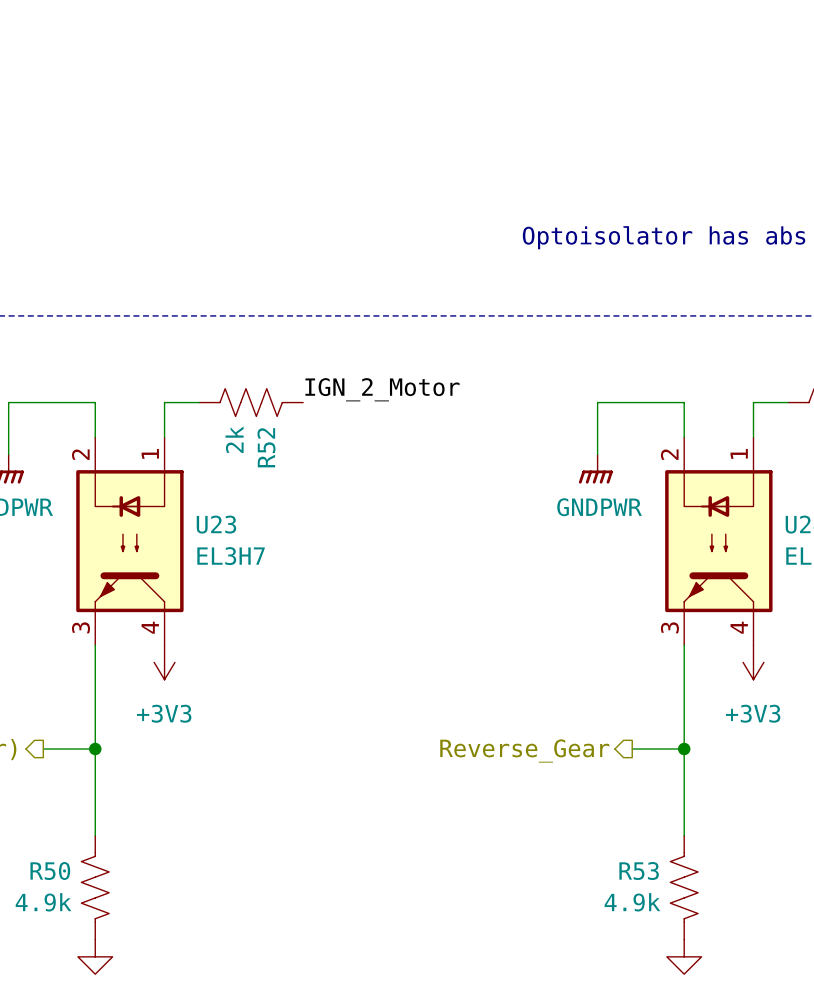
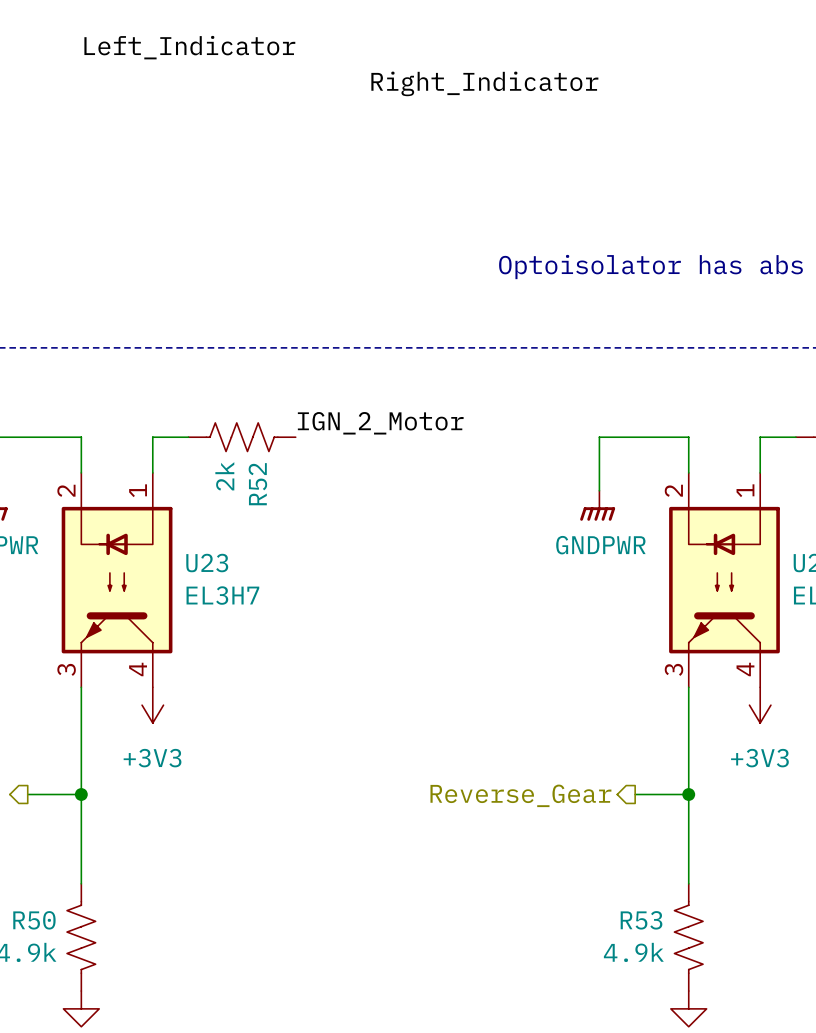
label: none -> Left_Indicator (189, 47)
label: none -> Right_Indicator (484, 83)

